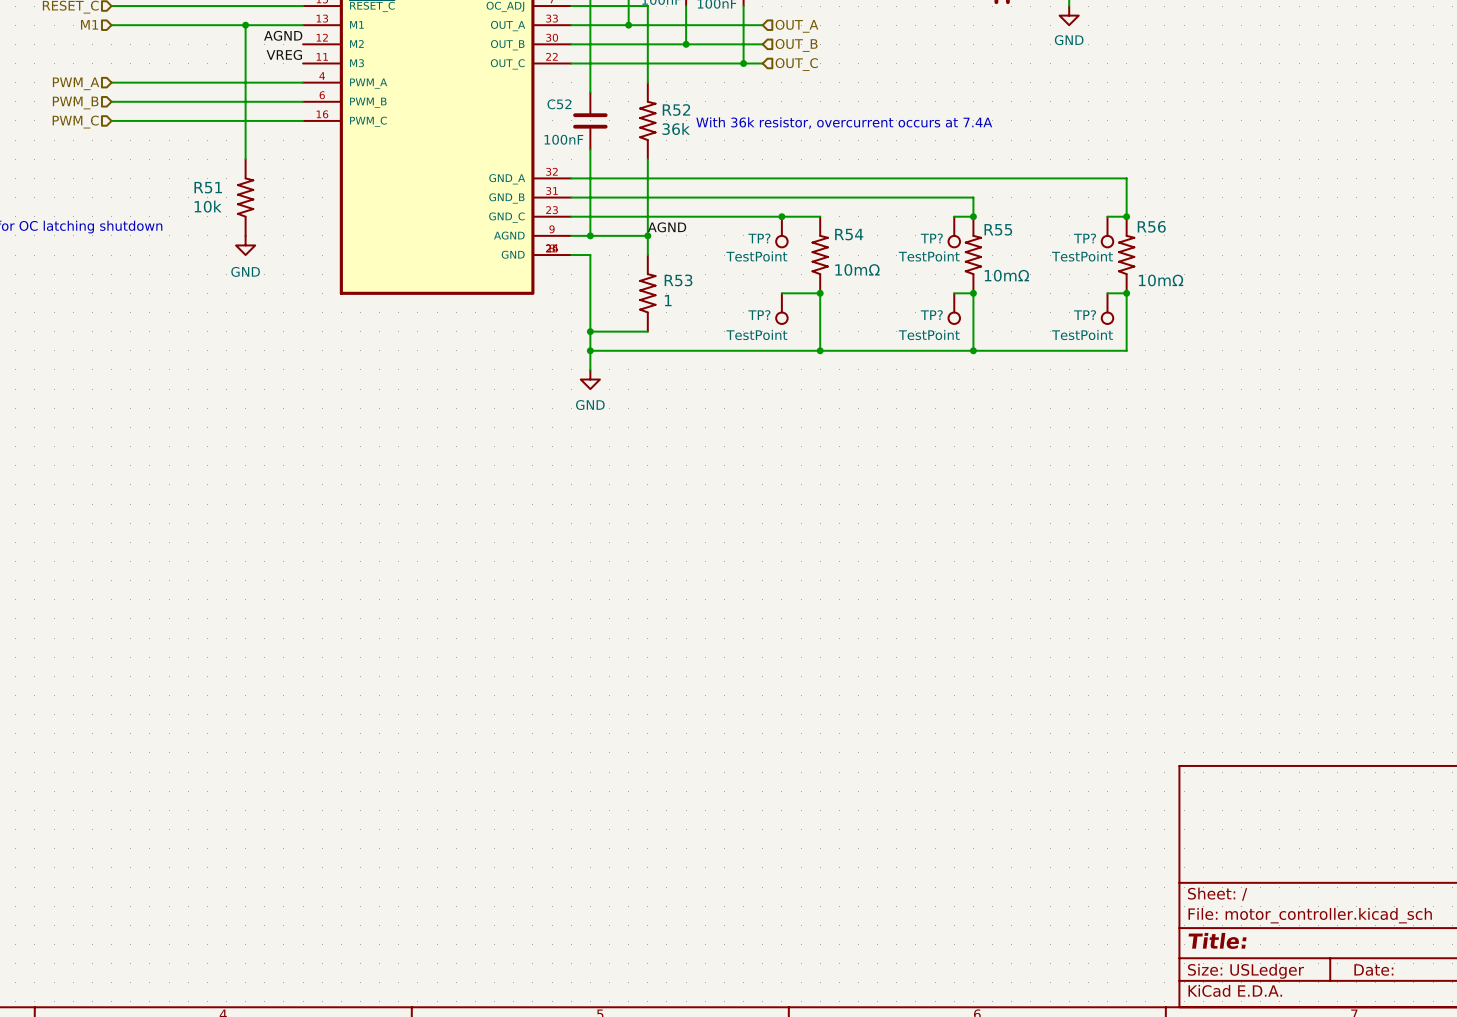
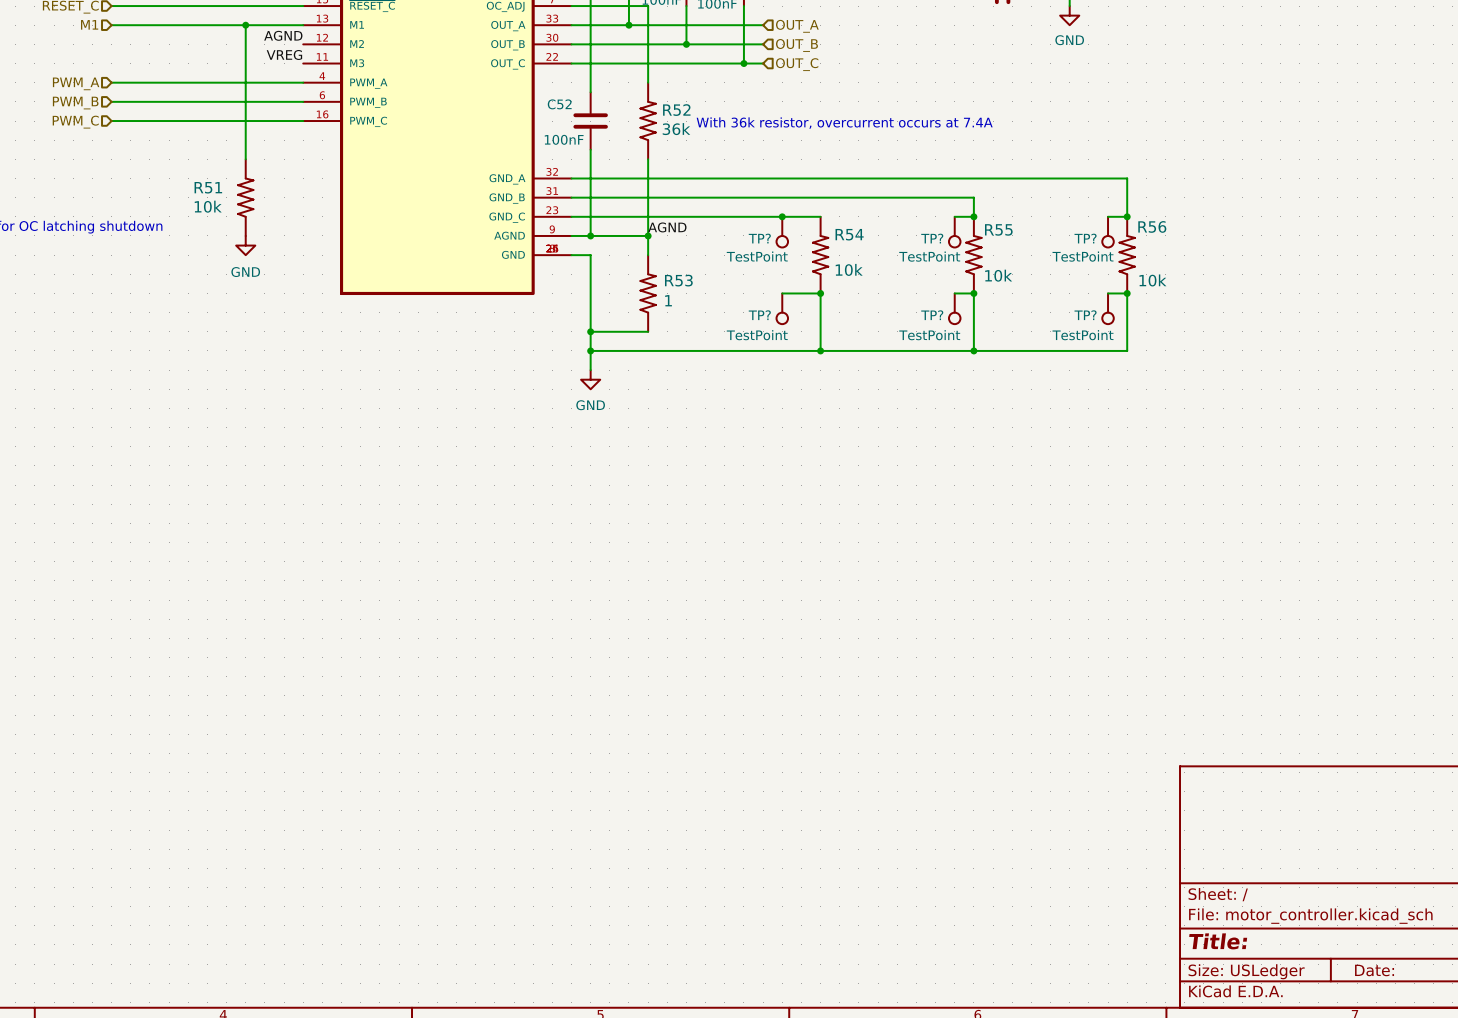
R54 value: 10mΩ (857, 269) -> 10k (849, 269)
R55 value: 10mΩ (1006, 275) -> 10k (998, 275)
R56 value: 10mΩ (1161, 280) -> 10k (1152, 280)

